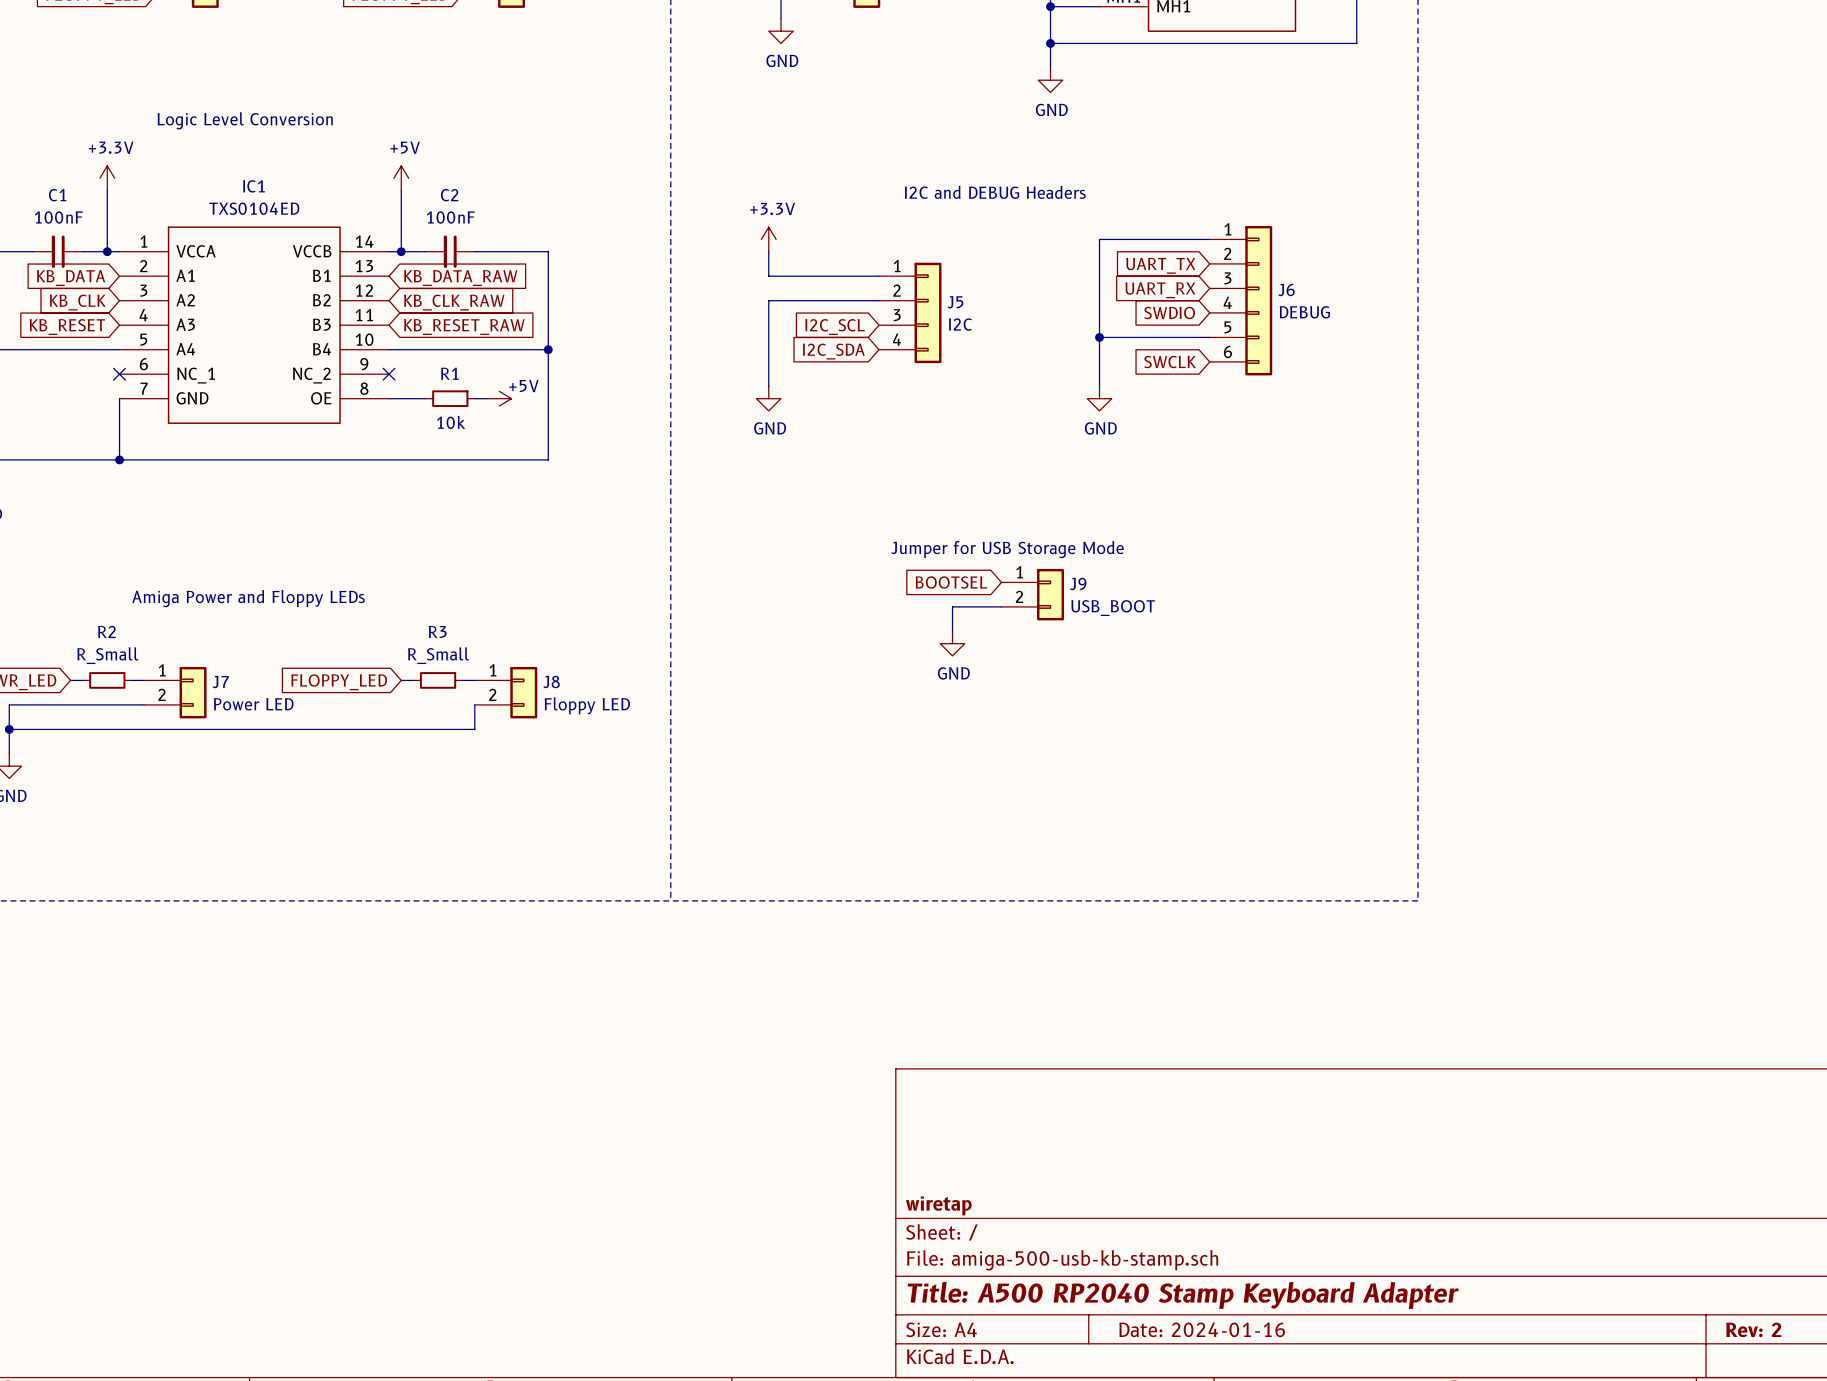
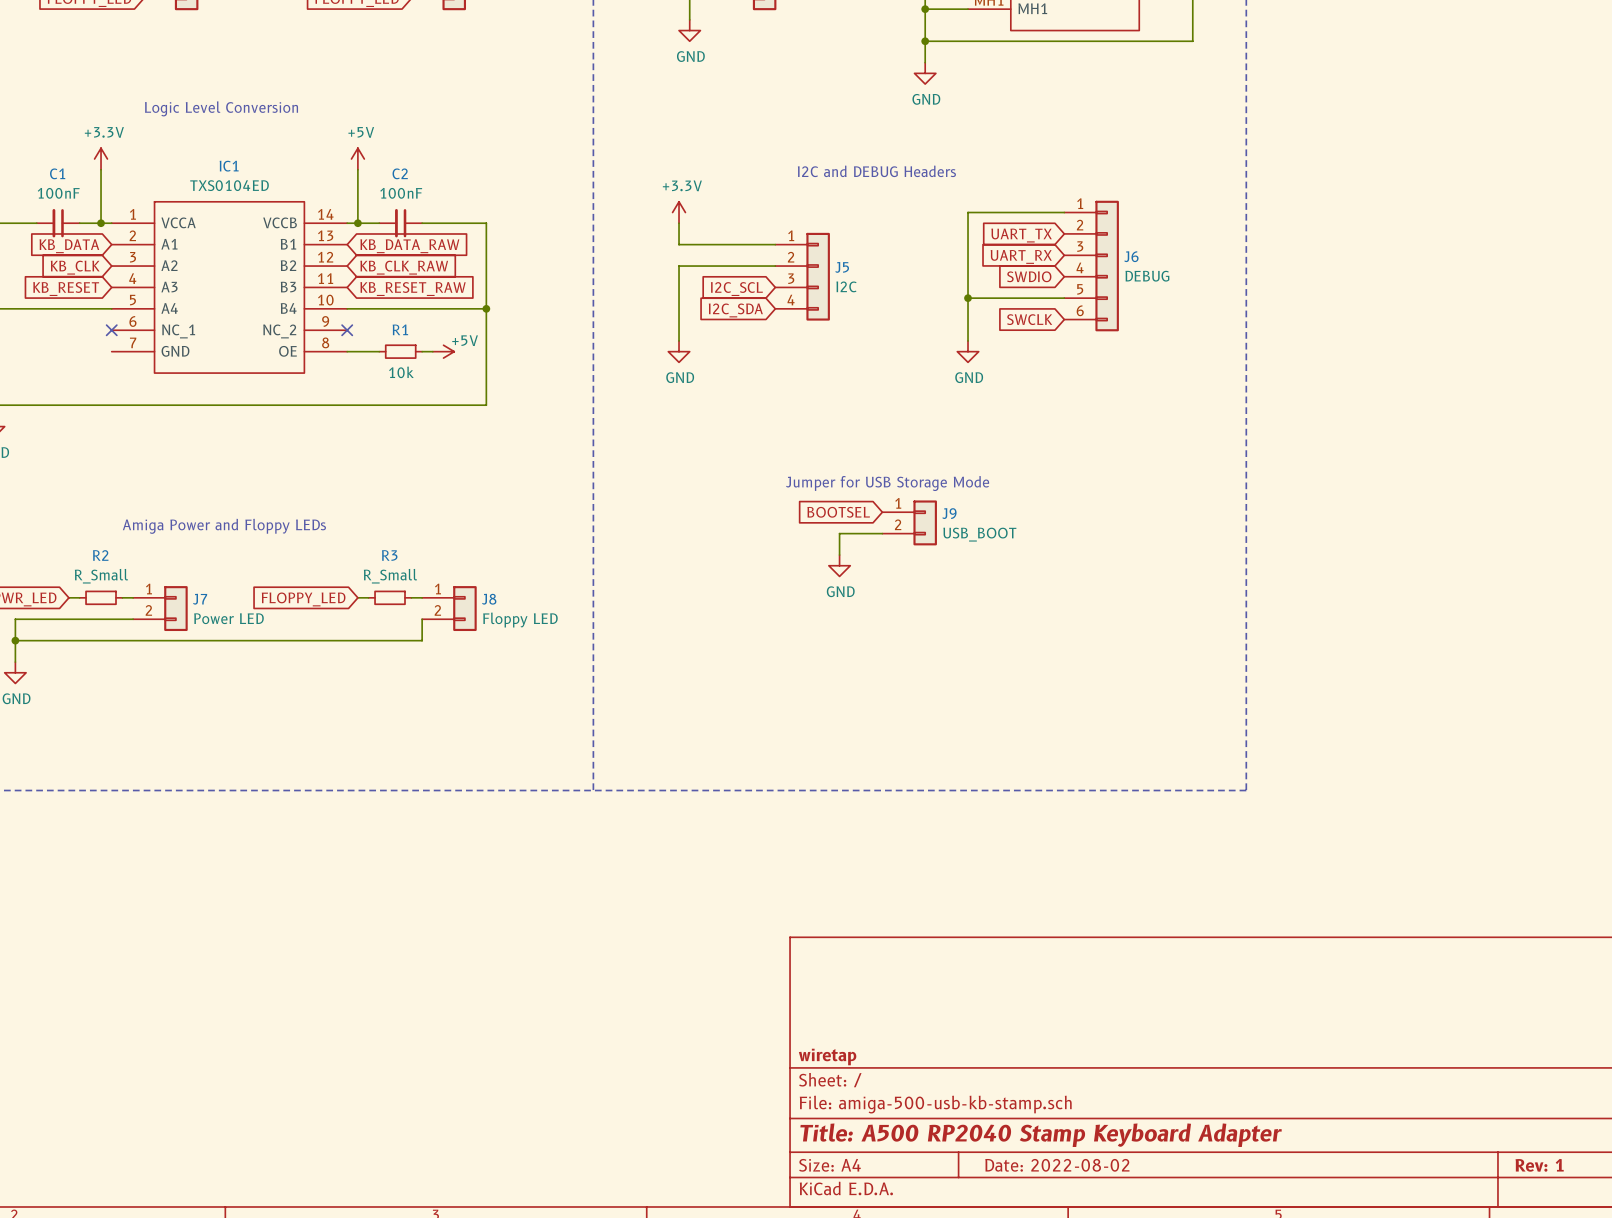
wire: (119, 398) (119, 459) -> none
junction: (119, 459) -> none
title block: Date: 2024-01-16 (1202, 1329) -> Date: 2022-08-02 (1057, 1165)
title block: Rev: 2 (1753, 1329) -> Rev: 1 (1539, 1165)

